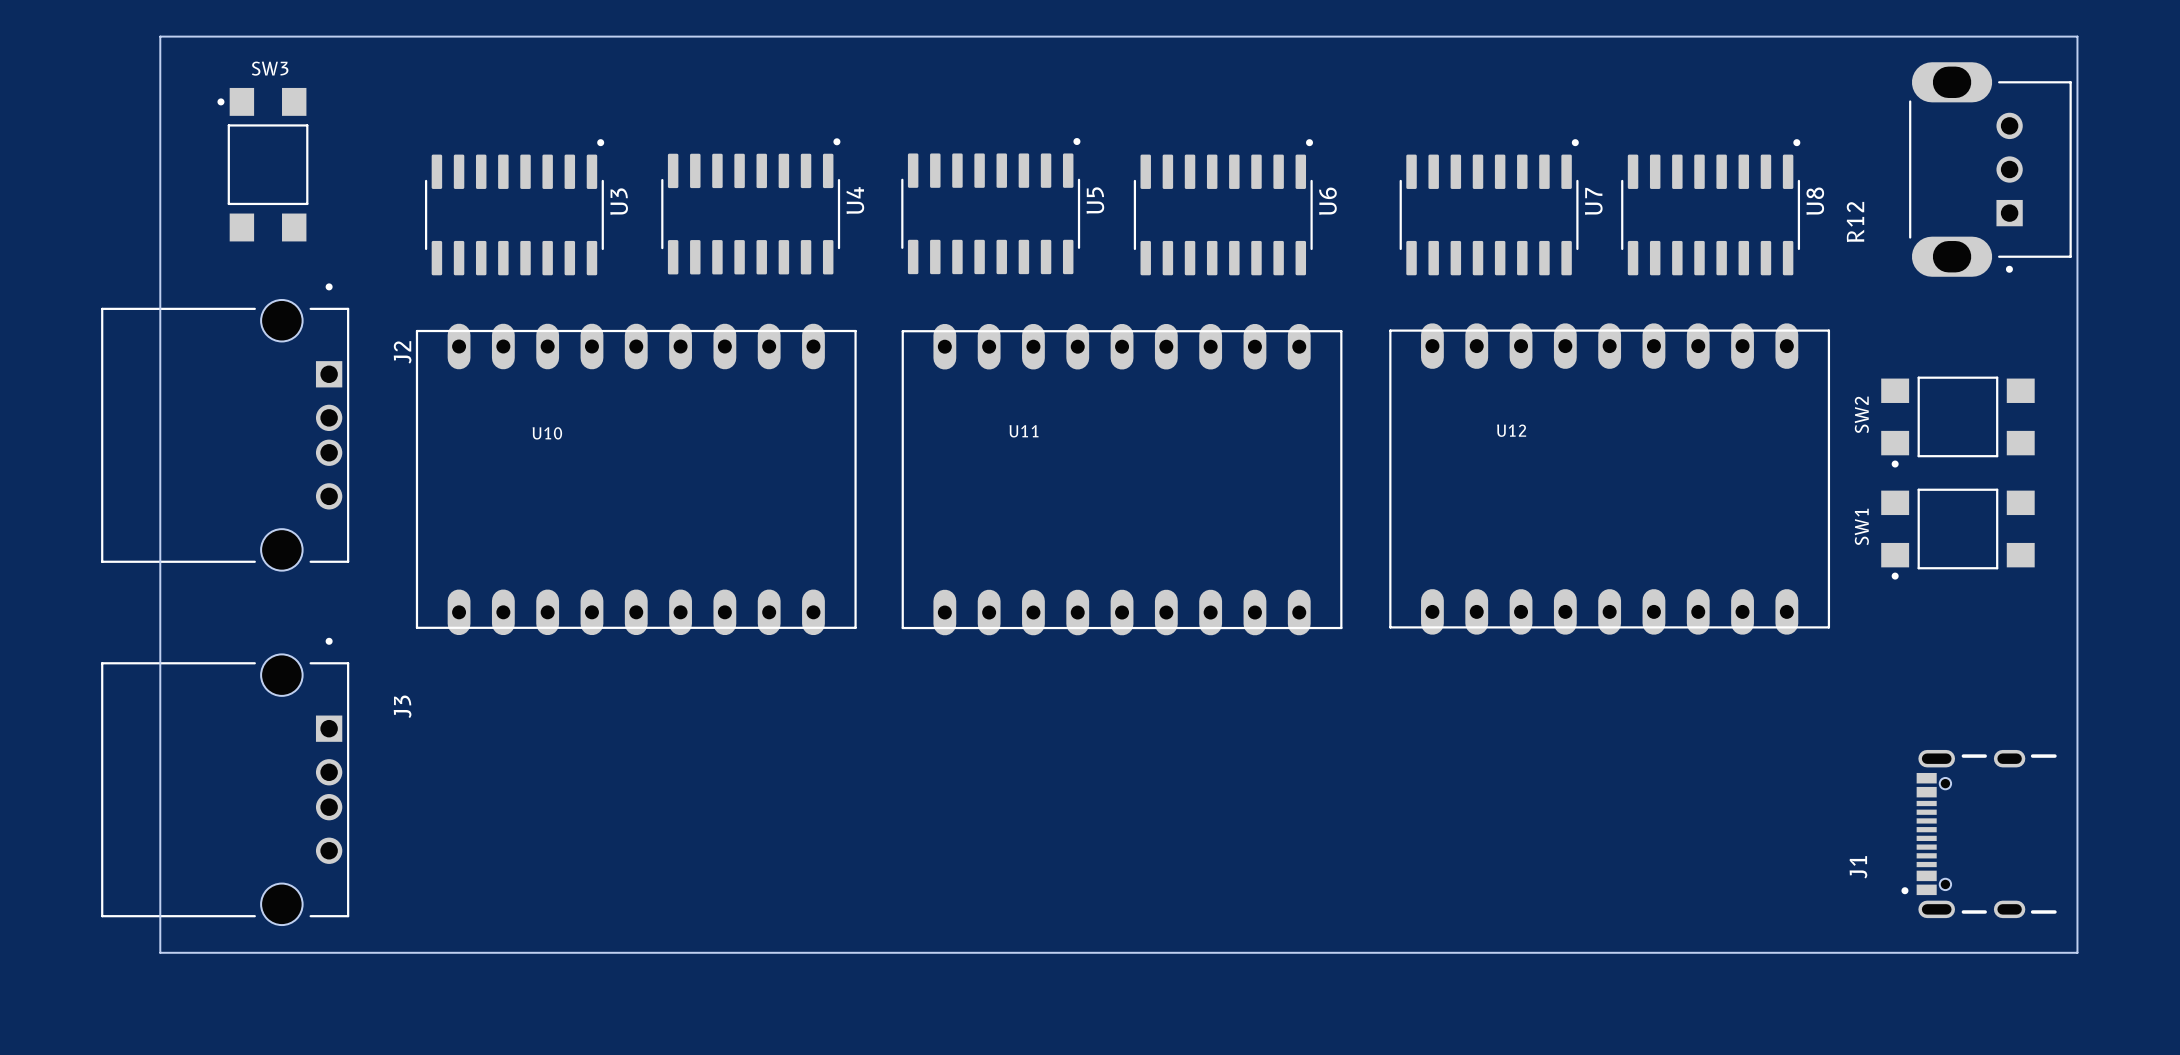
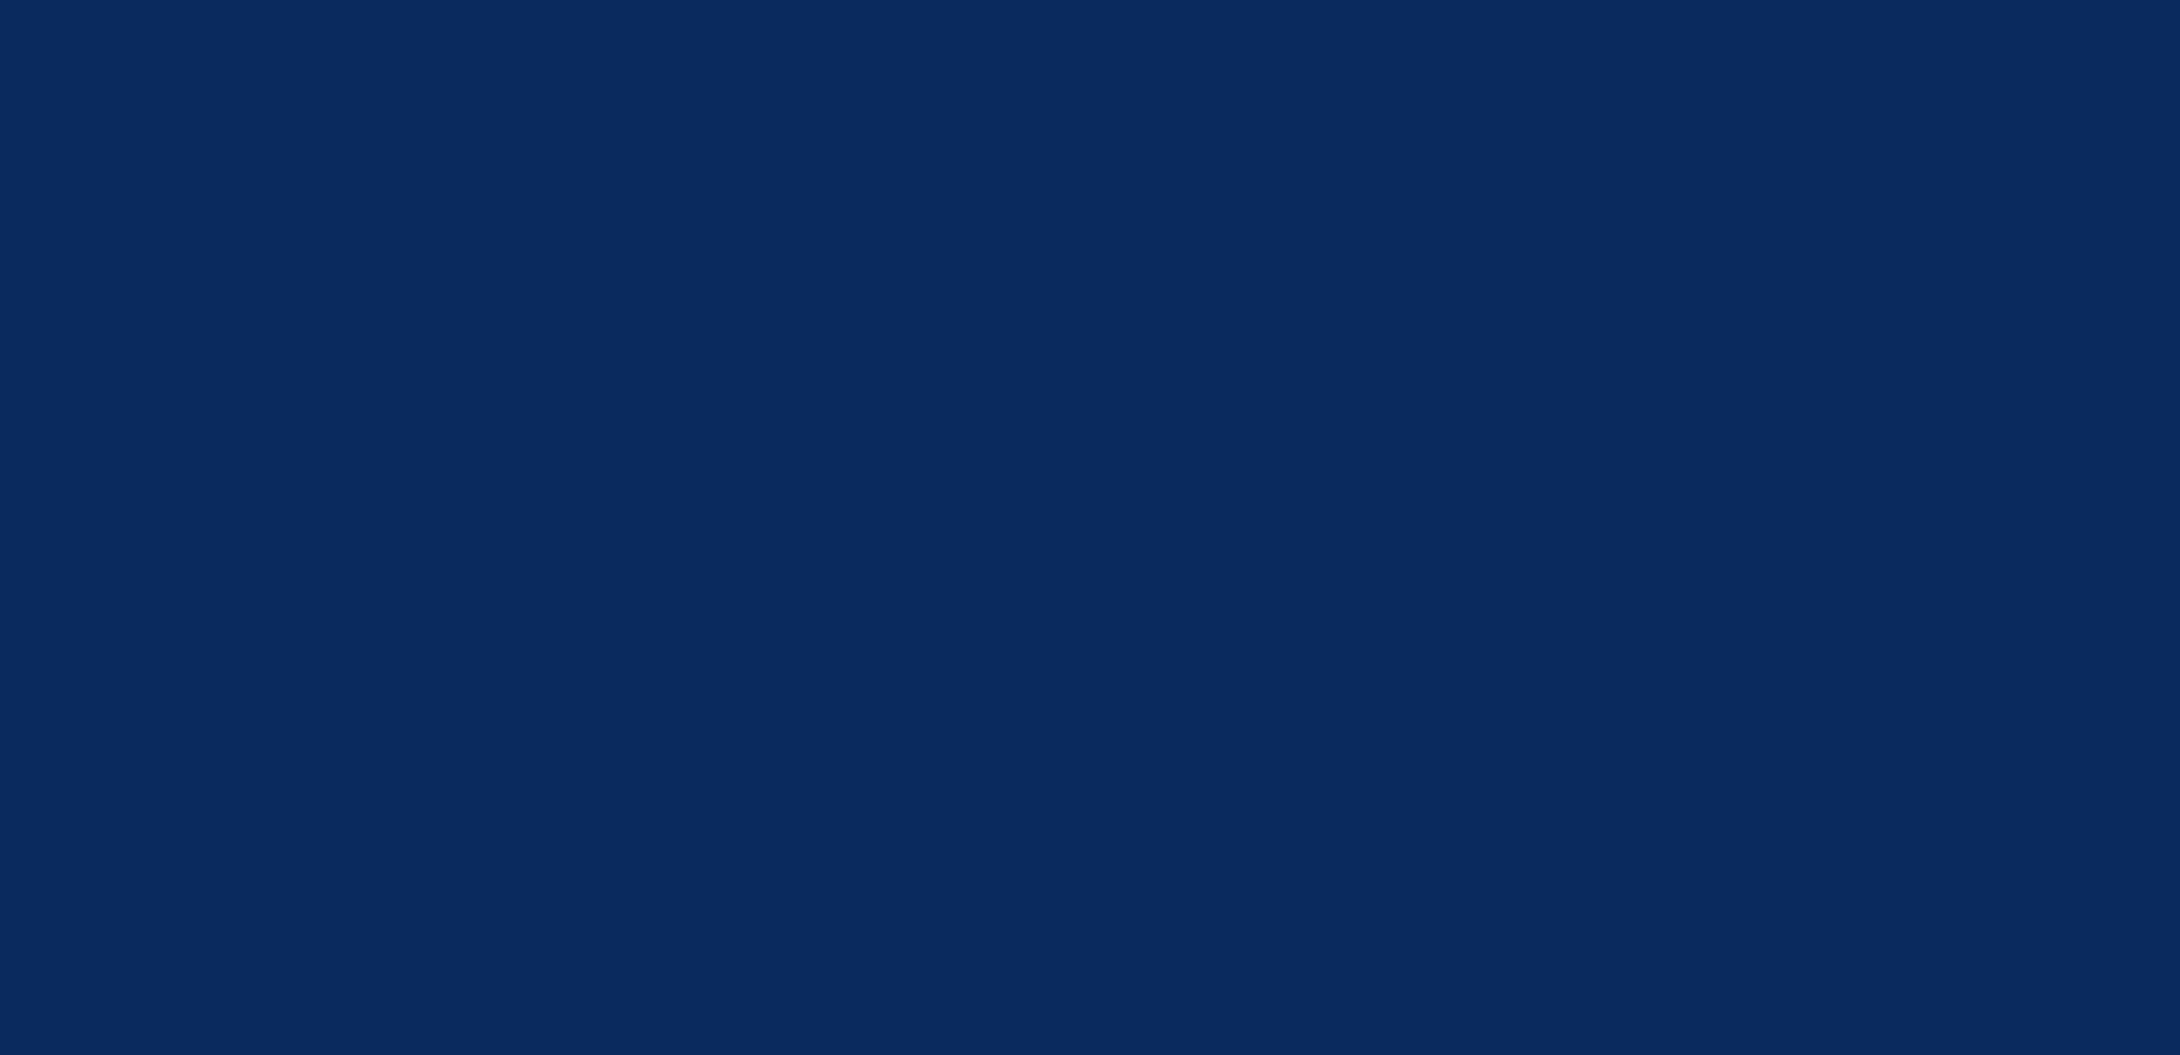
board edge: (160, 36) (2077, 36) (2077, 952) (160, 952) (160, 36) -> none
SW3: (262, 164) -> none
R12: (1990, 169) -> none
U4: (750, 206) -> none
U5: (990, 206) -> none
U3: (514, 207) -> none
U6: (1223, 207) -> none
U7: (1489, 207) -> none
U8: (1710, 207) -> none
SW2: (1957, 422) -> none
J2: (225, 427) -> none
U10: (636, 479) -> none
U11: (1122, 479) -> none
U12: (1609, 479) -> none
SW1: (1957, 534) -> none
J3: (225, 781) -> none
J1: (1979, 834) -> none

